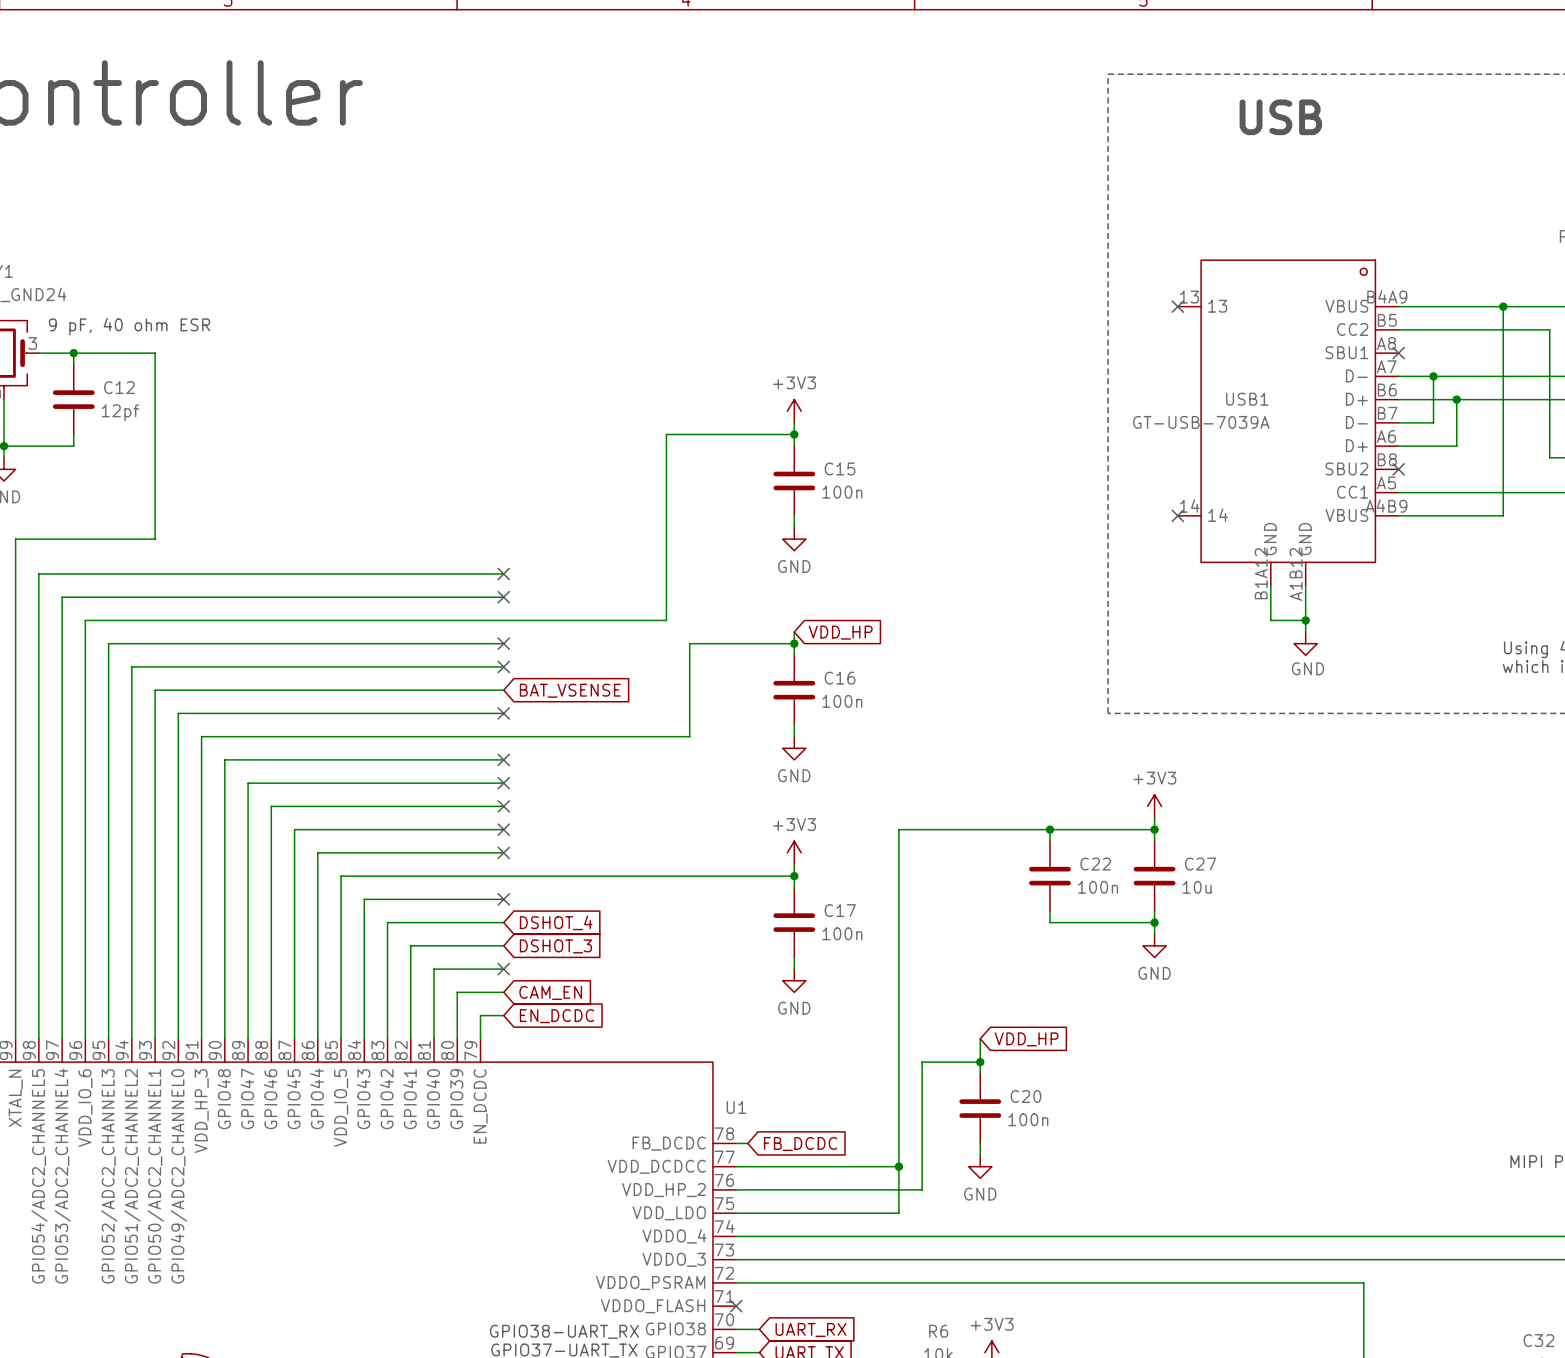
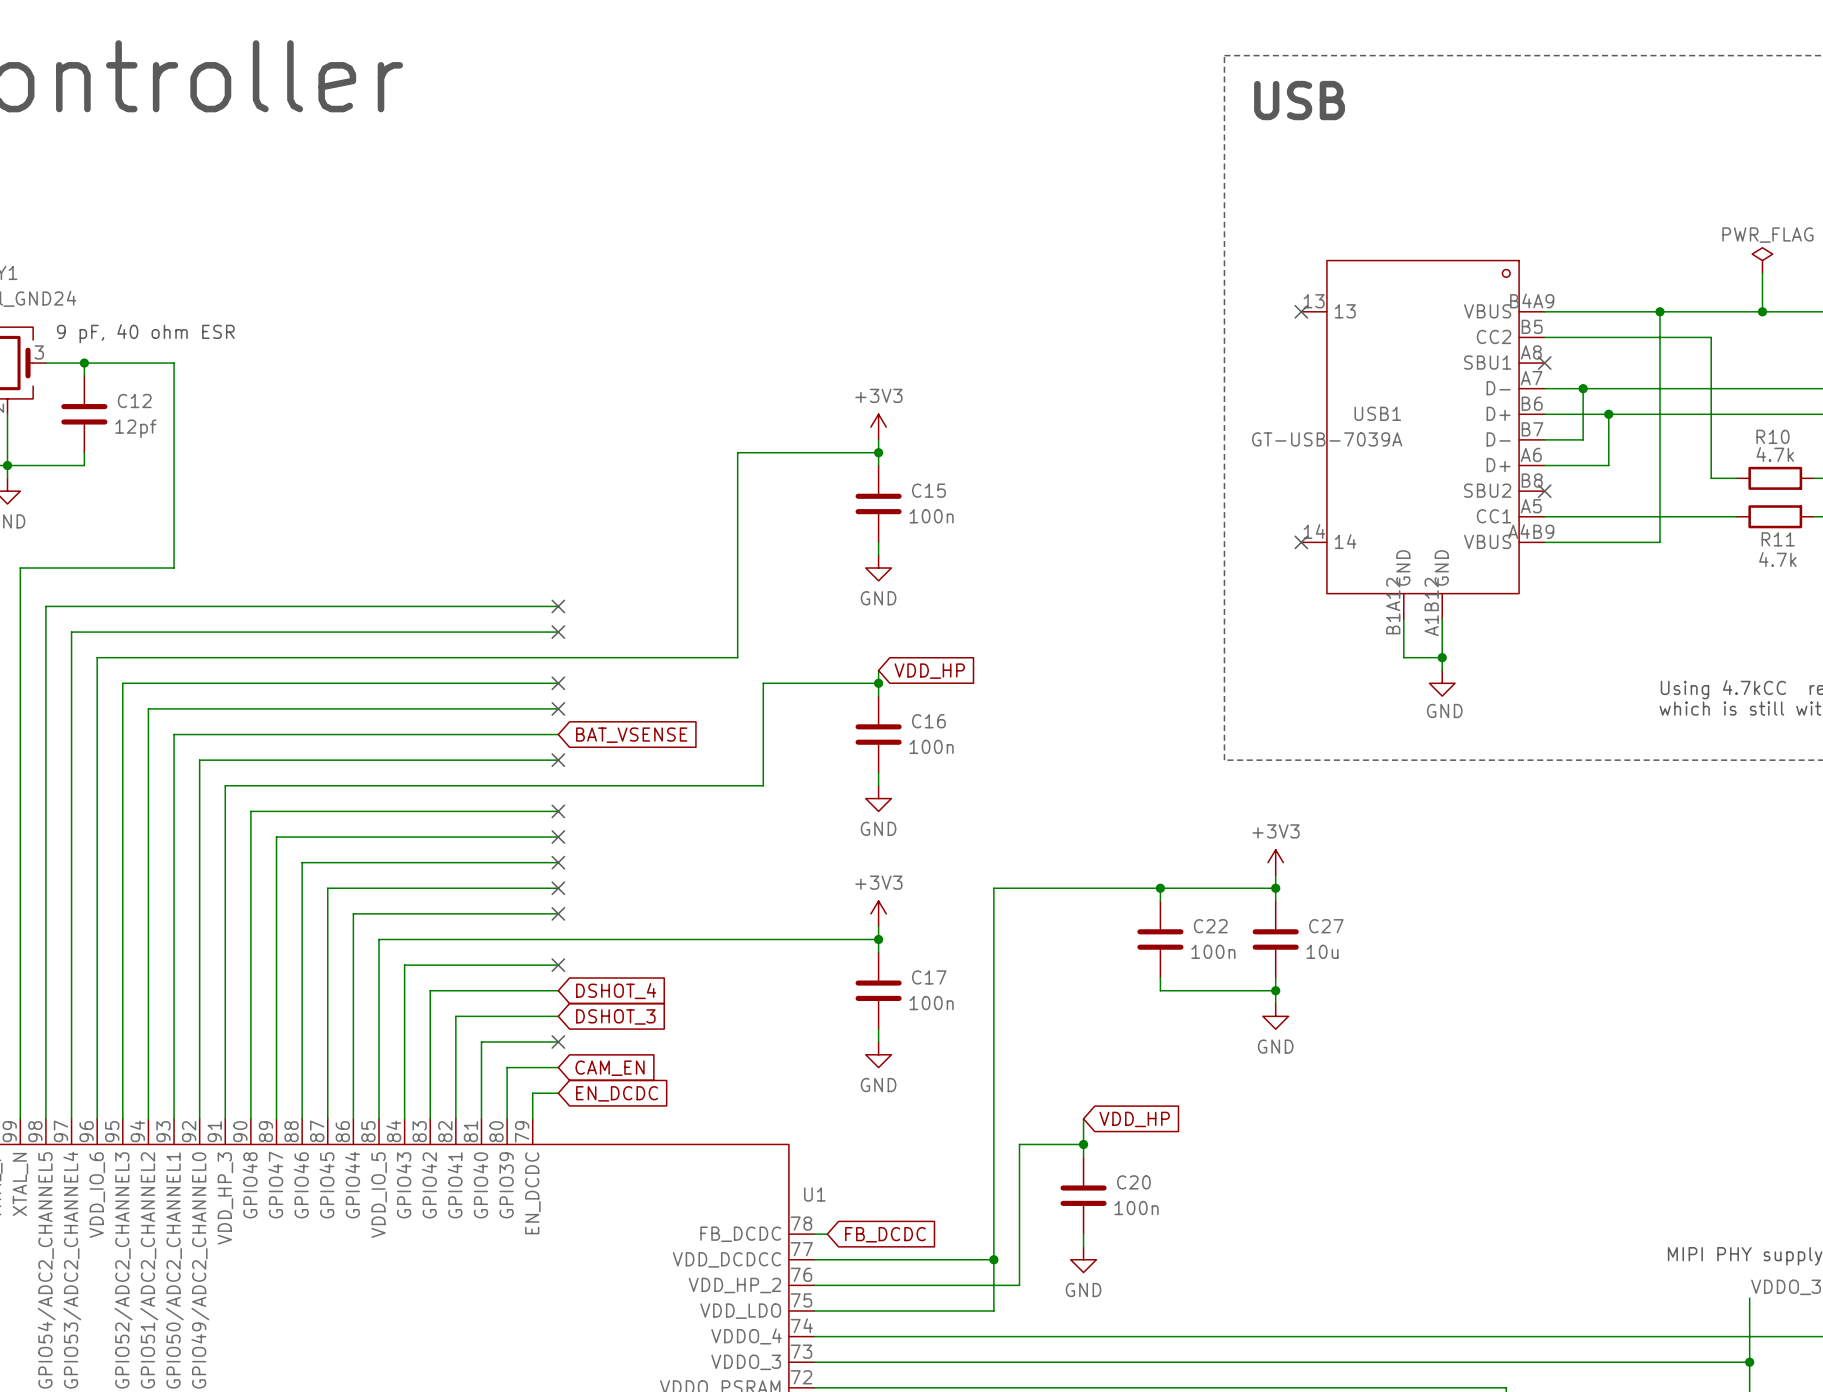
text position: USB (1280, 117) -> USB (1299, 100)

